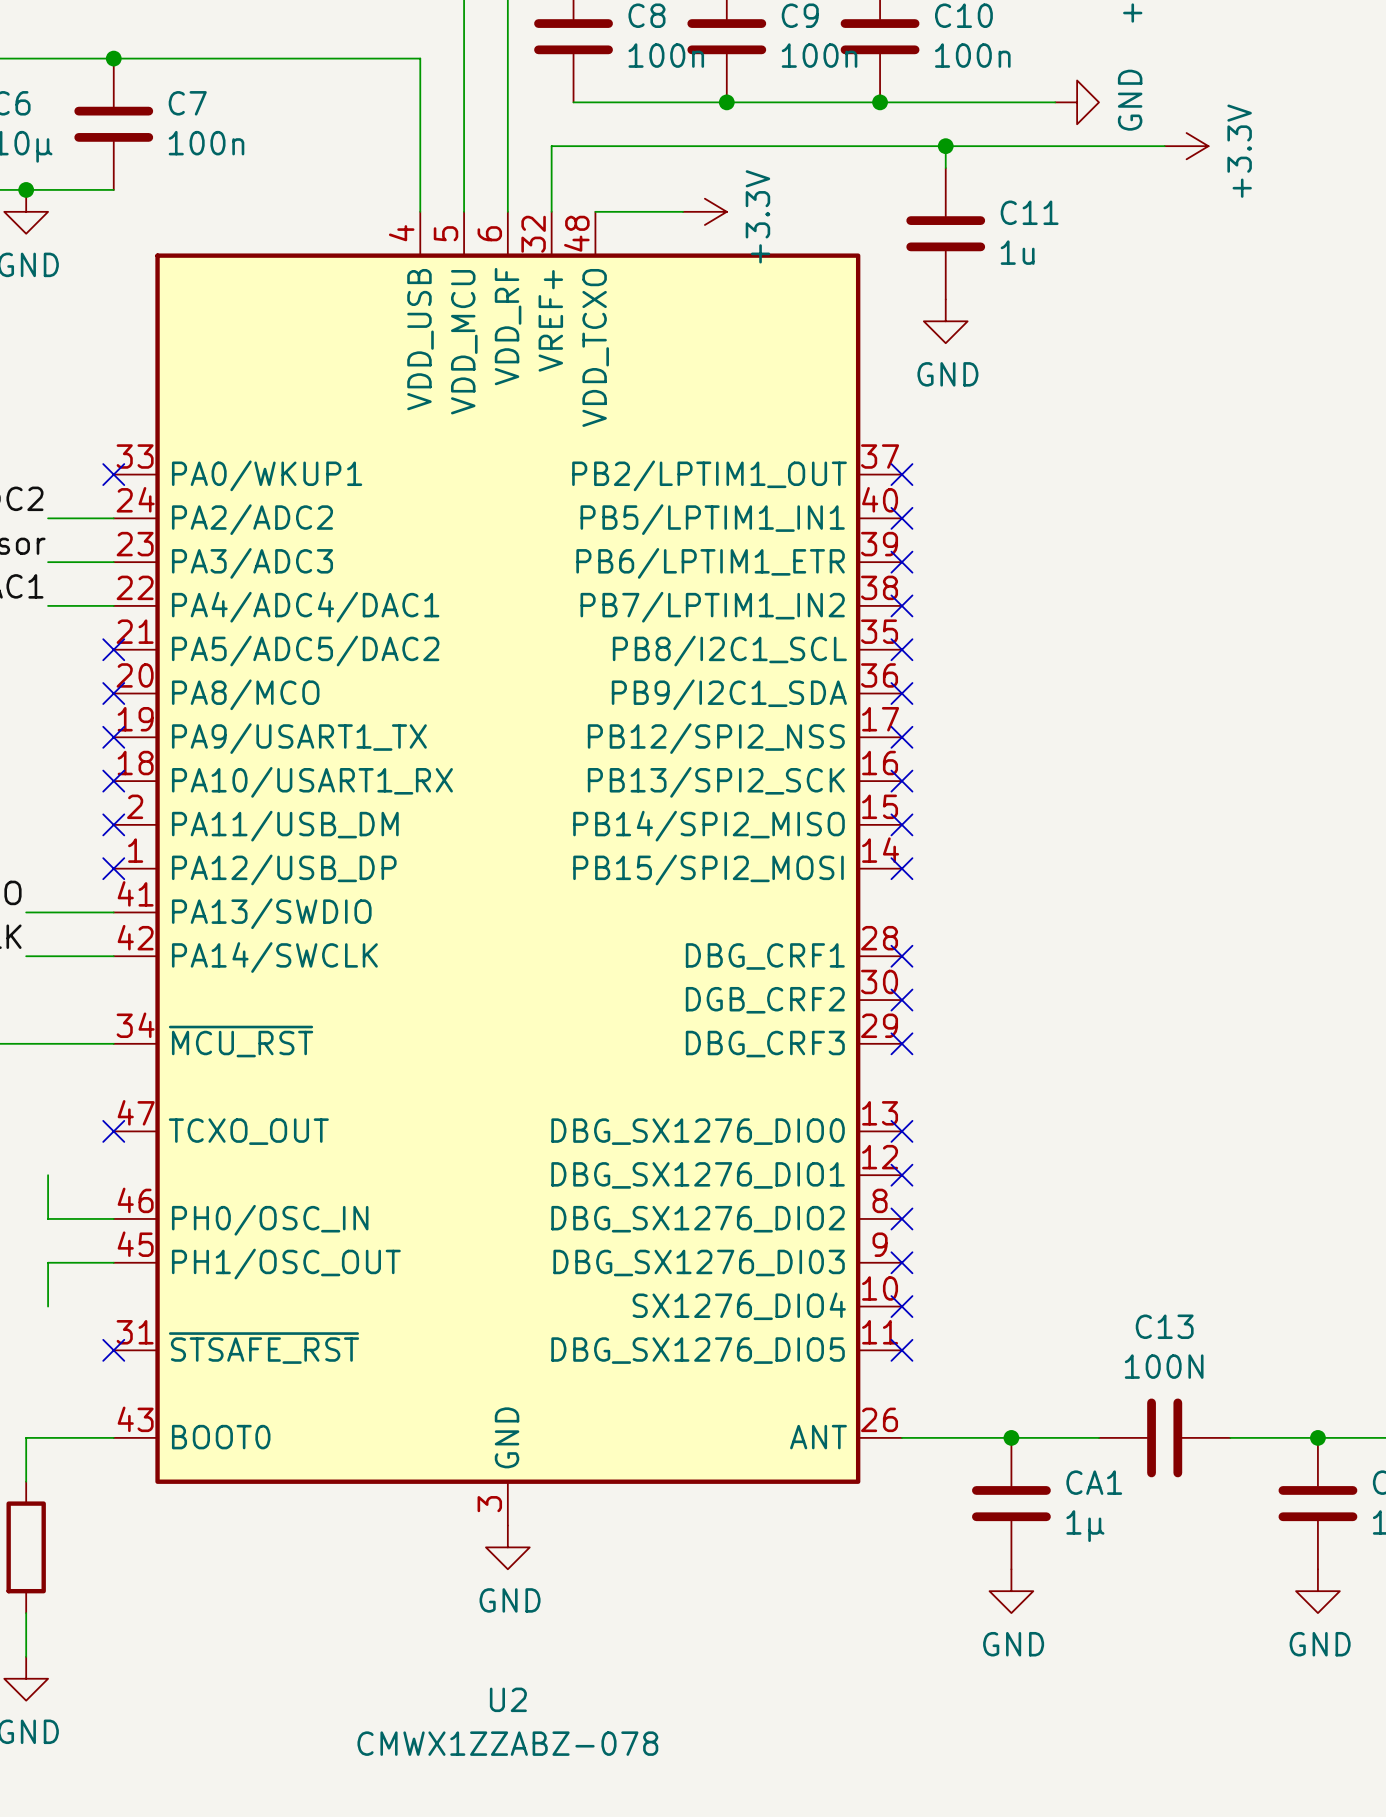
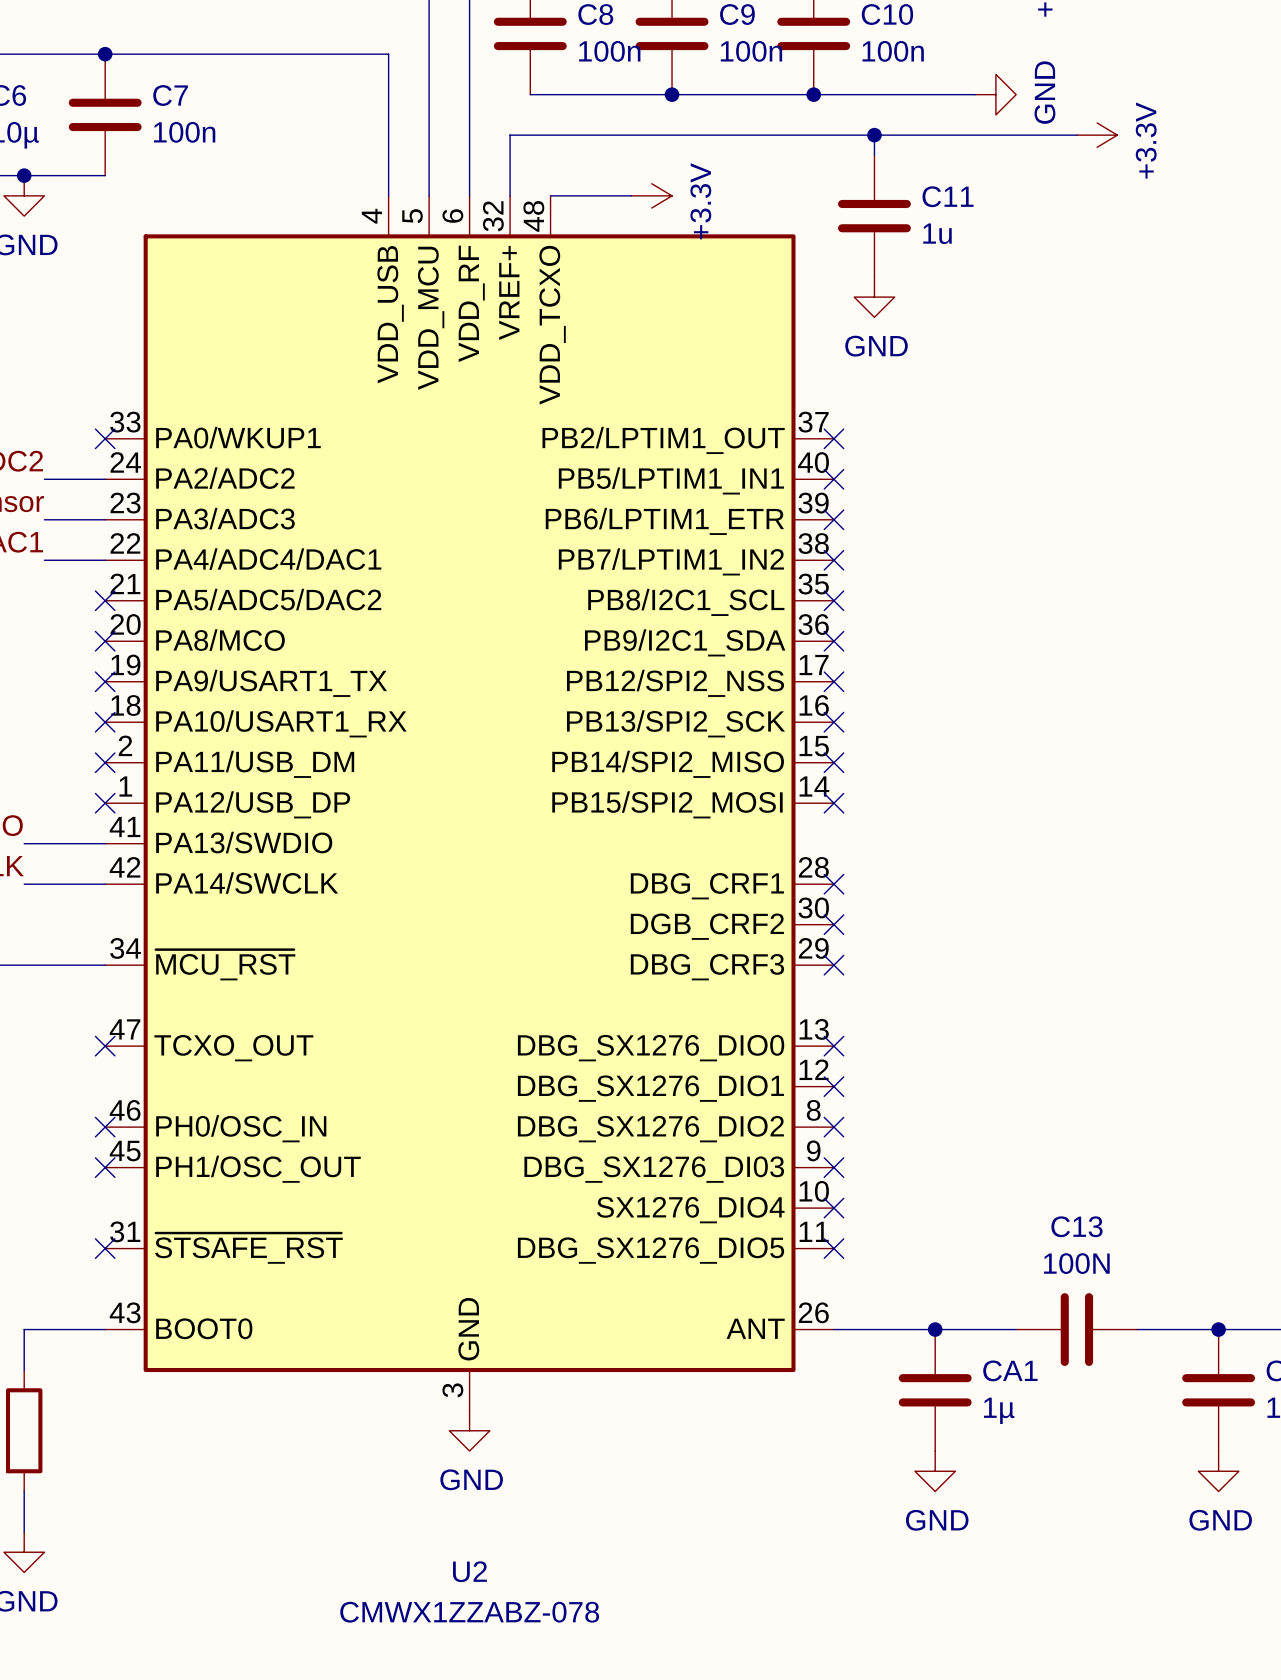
wire: (48, 1175) (48, 1218) (113, 1218) -> none
no-connect mark: none -> (105, 1127)
wire: (113, 1262) (48, 1262) (48, 1306) -> none
no-connect mark: none -> (105, 1167)

